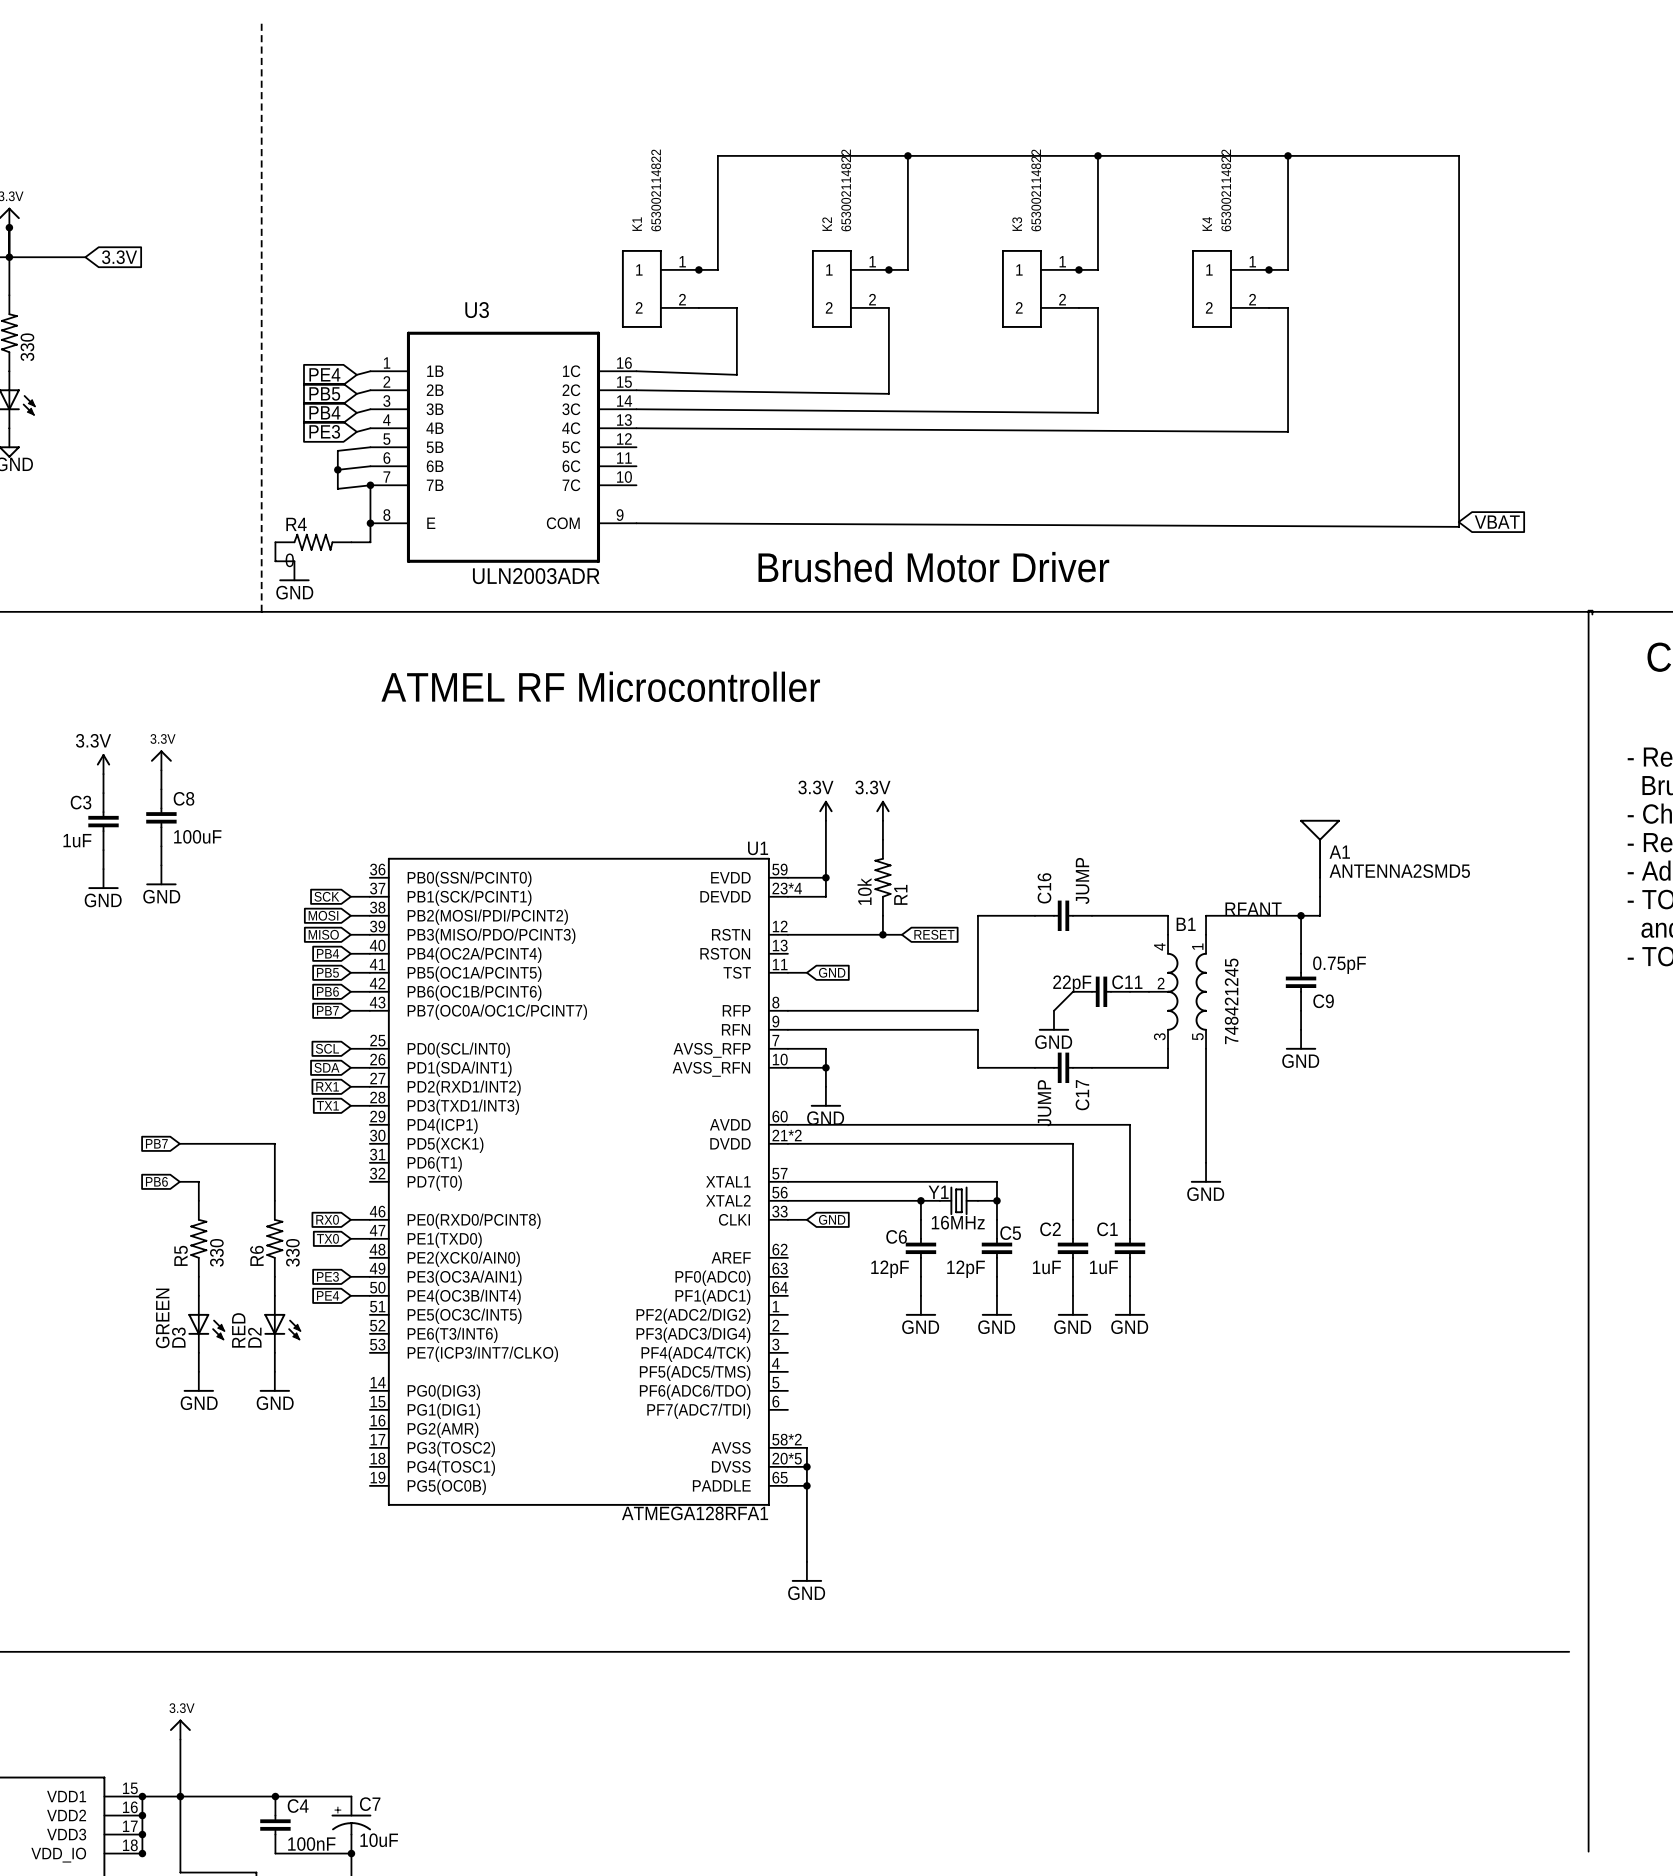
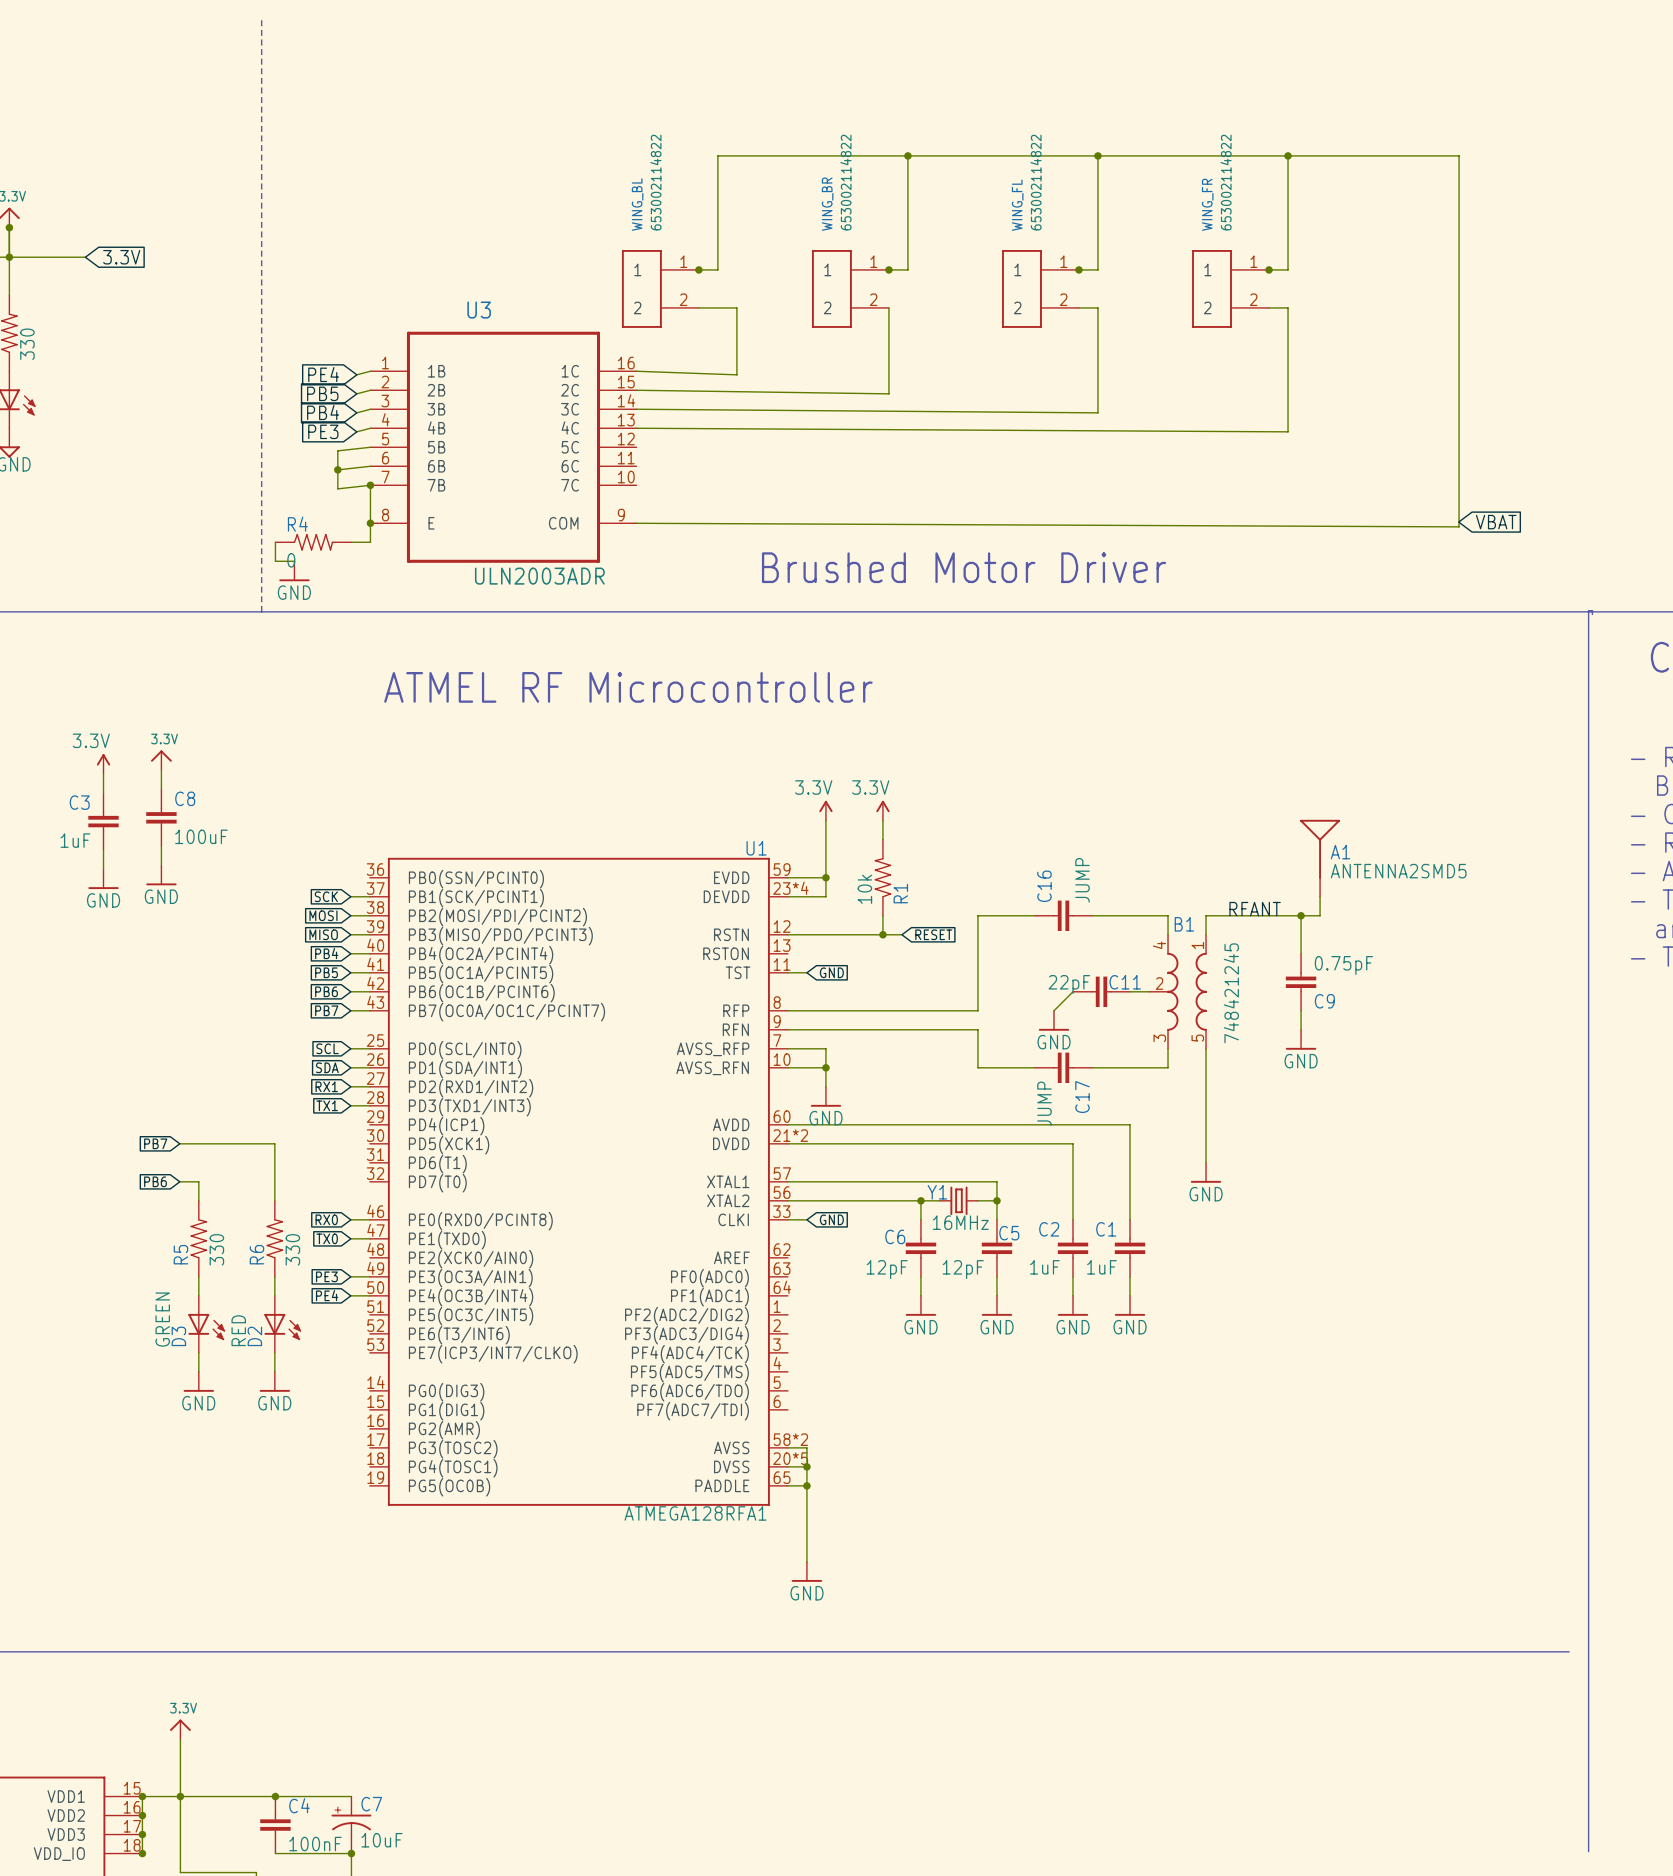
K1 name: K1 (637, 224) -> WING_BL (637, 204)
K2 name: K2 (827, 224) -> WING_BR (827, 204)
K3 name: K3 (1017, 224) -> WING_FL (1017, 205)
K4 name: K4 (1207, 224) -> WING_FR (1207, 204)

